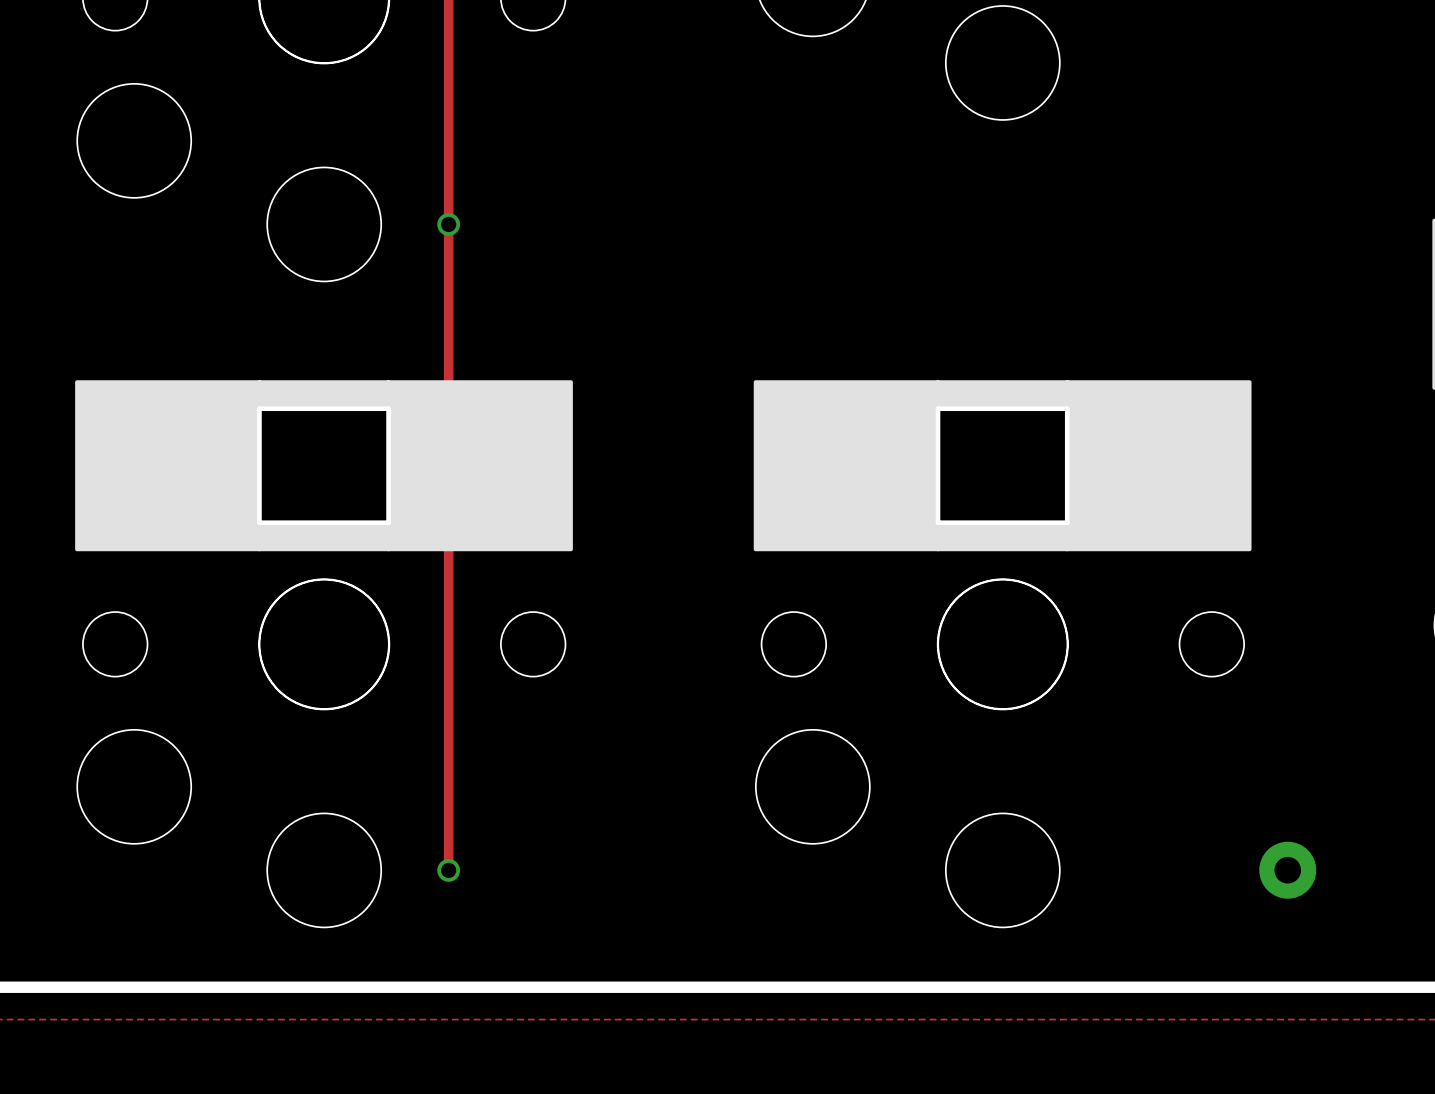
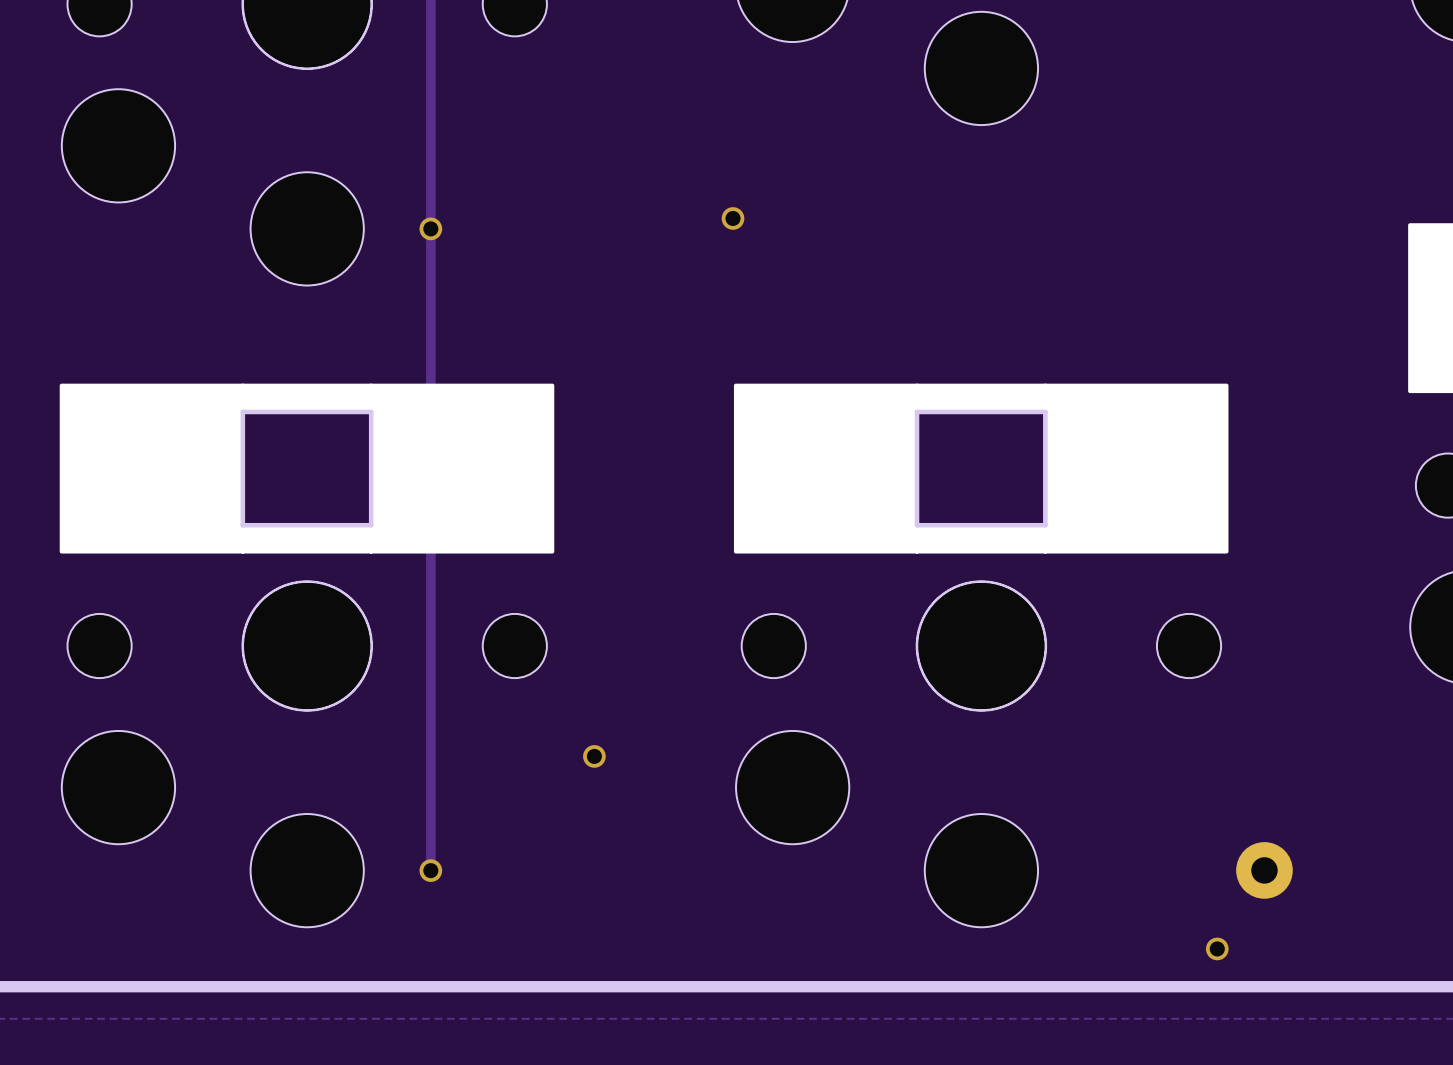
via: none -> (733, 218)
via: none -> (594, 756)
via: none -> (1217, 948)

